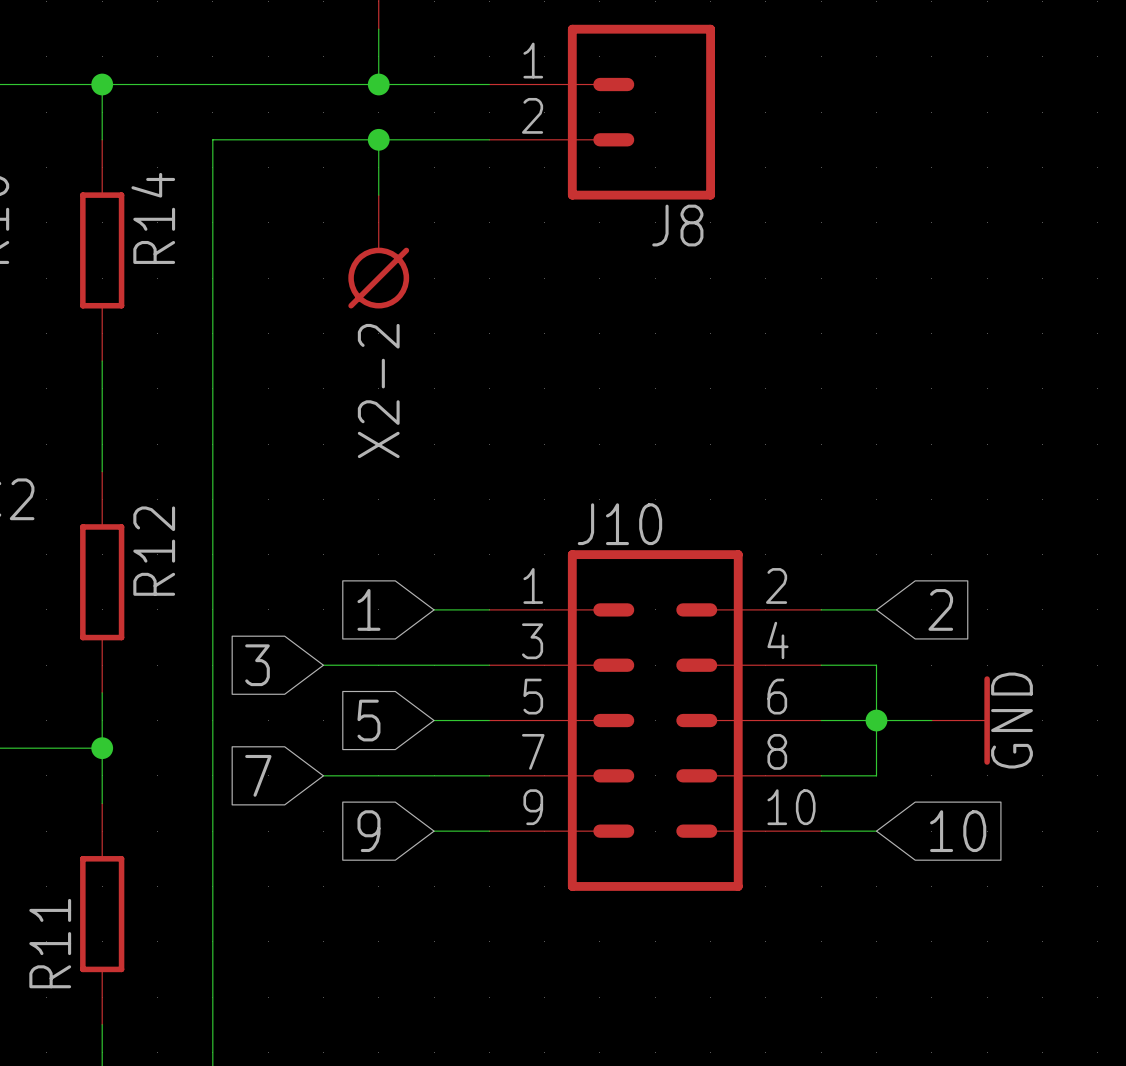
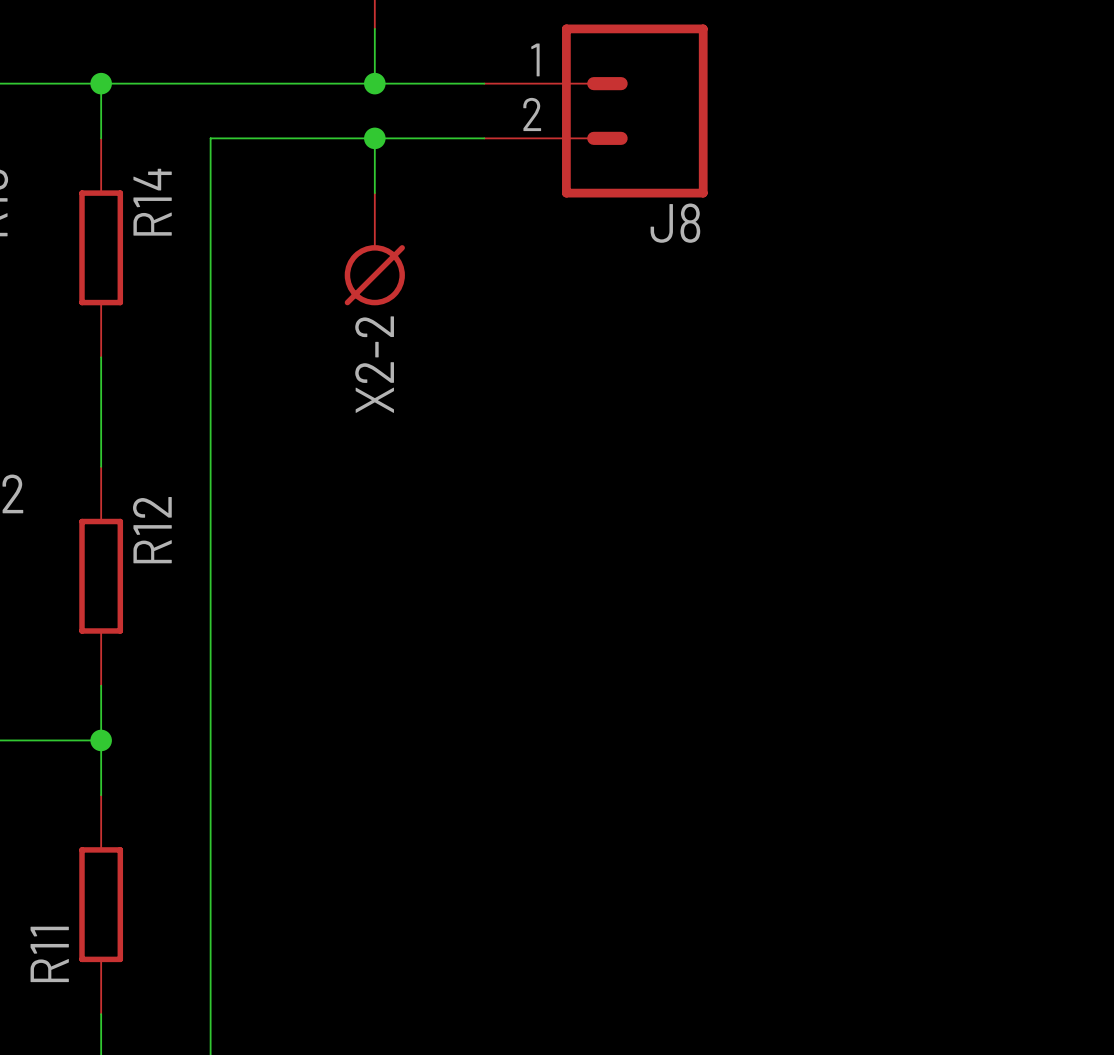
global label: 1 (368, 609) -> none
wire: (434, 609) (489, 609) -> none
wire: (821, 609) (876, 609) -> none
global label: 2 (940, 609) -> none
global label: 3 (257, 665) -> none
wire: (323, 665) (489, 665) -> none
wire: (821, 665) (876, 665) (876, 775) (821, 775) -> none
global label: 5 (368, 720) -> none
wire: (434, 720) (489, 720) -> none
J10: (655, 720) -> none
wire: (821, 720) (931, 720) -> none
junction: (876, 720) -> none
power symbol: GND (960, 720) -> none
global label: 7 (258, 775) -> none
wire: (323, 775) (489, 775) -> none
global label: 9 (368, 831) -> none
wire: (434, 831) (489, 831) -> none
wire: (821, 831) (876, 831) -> none
global label: 10 (958, 831) -> none

